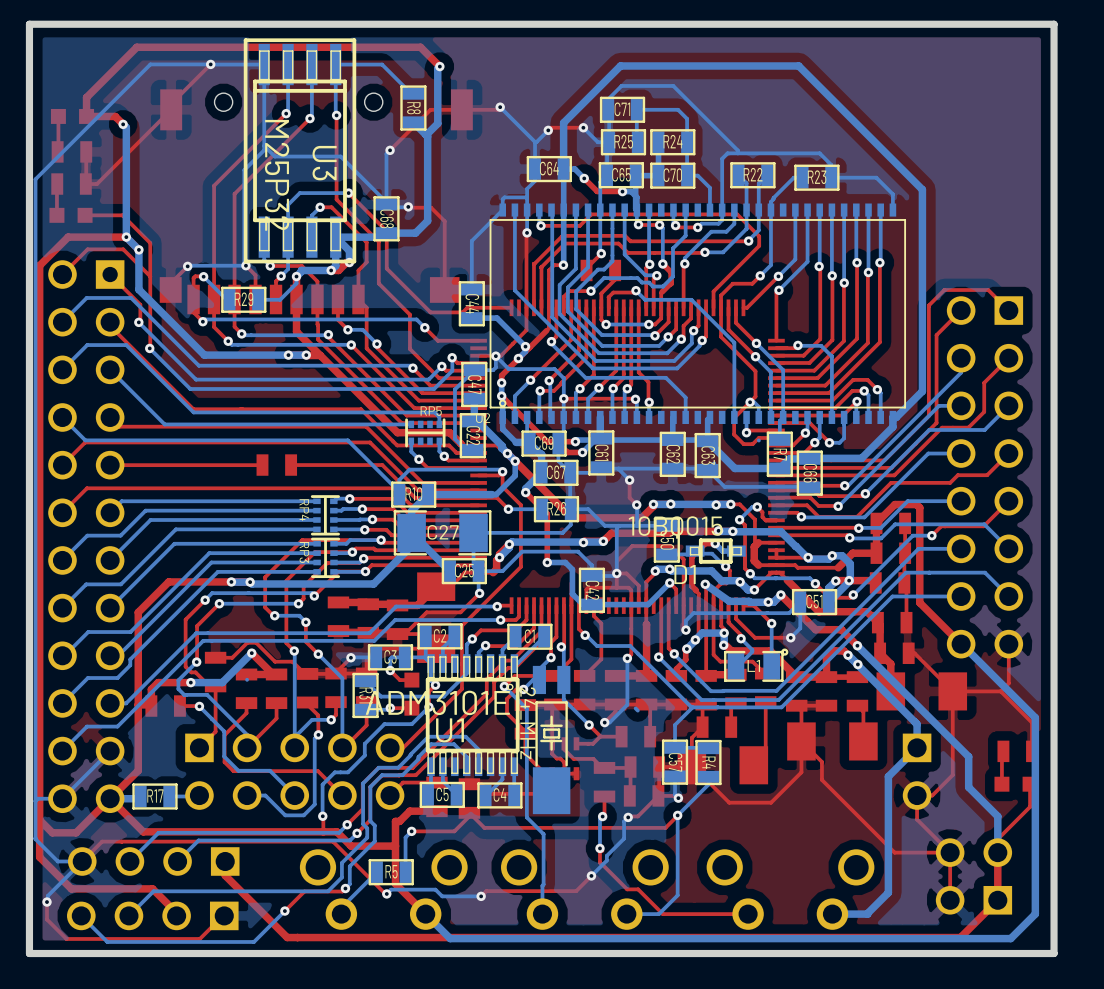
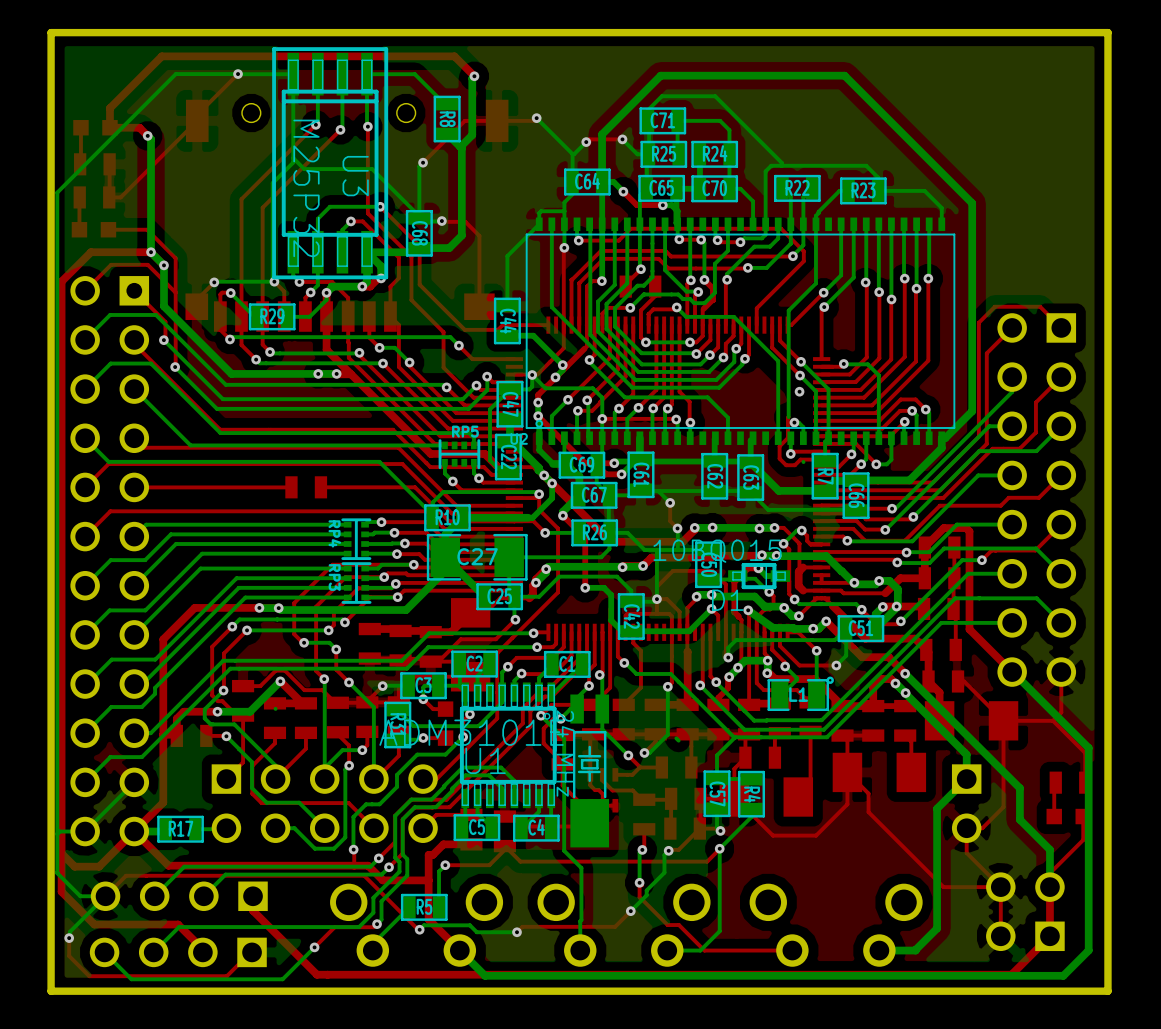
bottom track: (770, 265) (760, 275) -> (815, 281) (815, 283) (788, 310) (788, 417)
top track: (760, 275) (752, 283) (732, 283) (721, 295) (721, 336) (755, 371) (755, 396) (734, 418) (734, 434) (743, 444) (752, 444) (758, 437) (776, 437) -> (788, 417) (787, 437) (779, 446) (779, 458) (786, 465) (794, 465) (800, 459) (821, 459)
via position: (760, 275) -> (799, 391)

